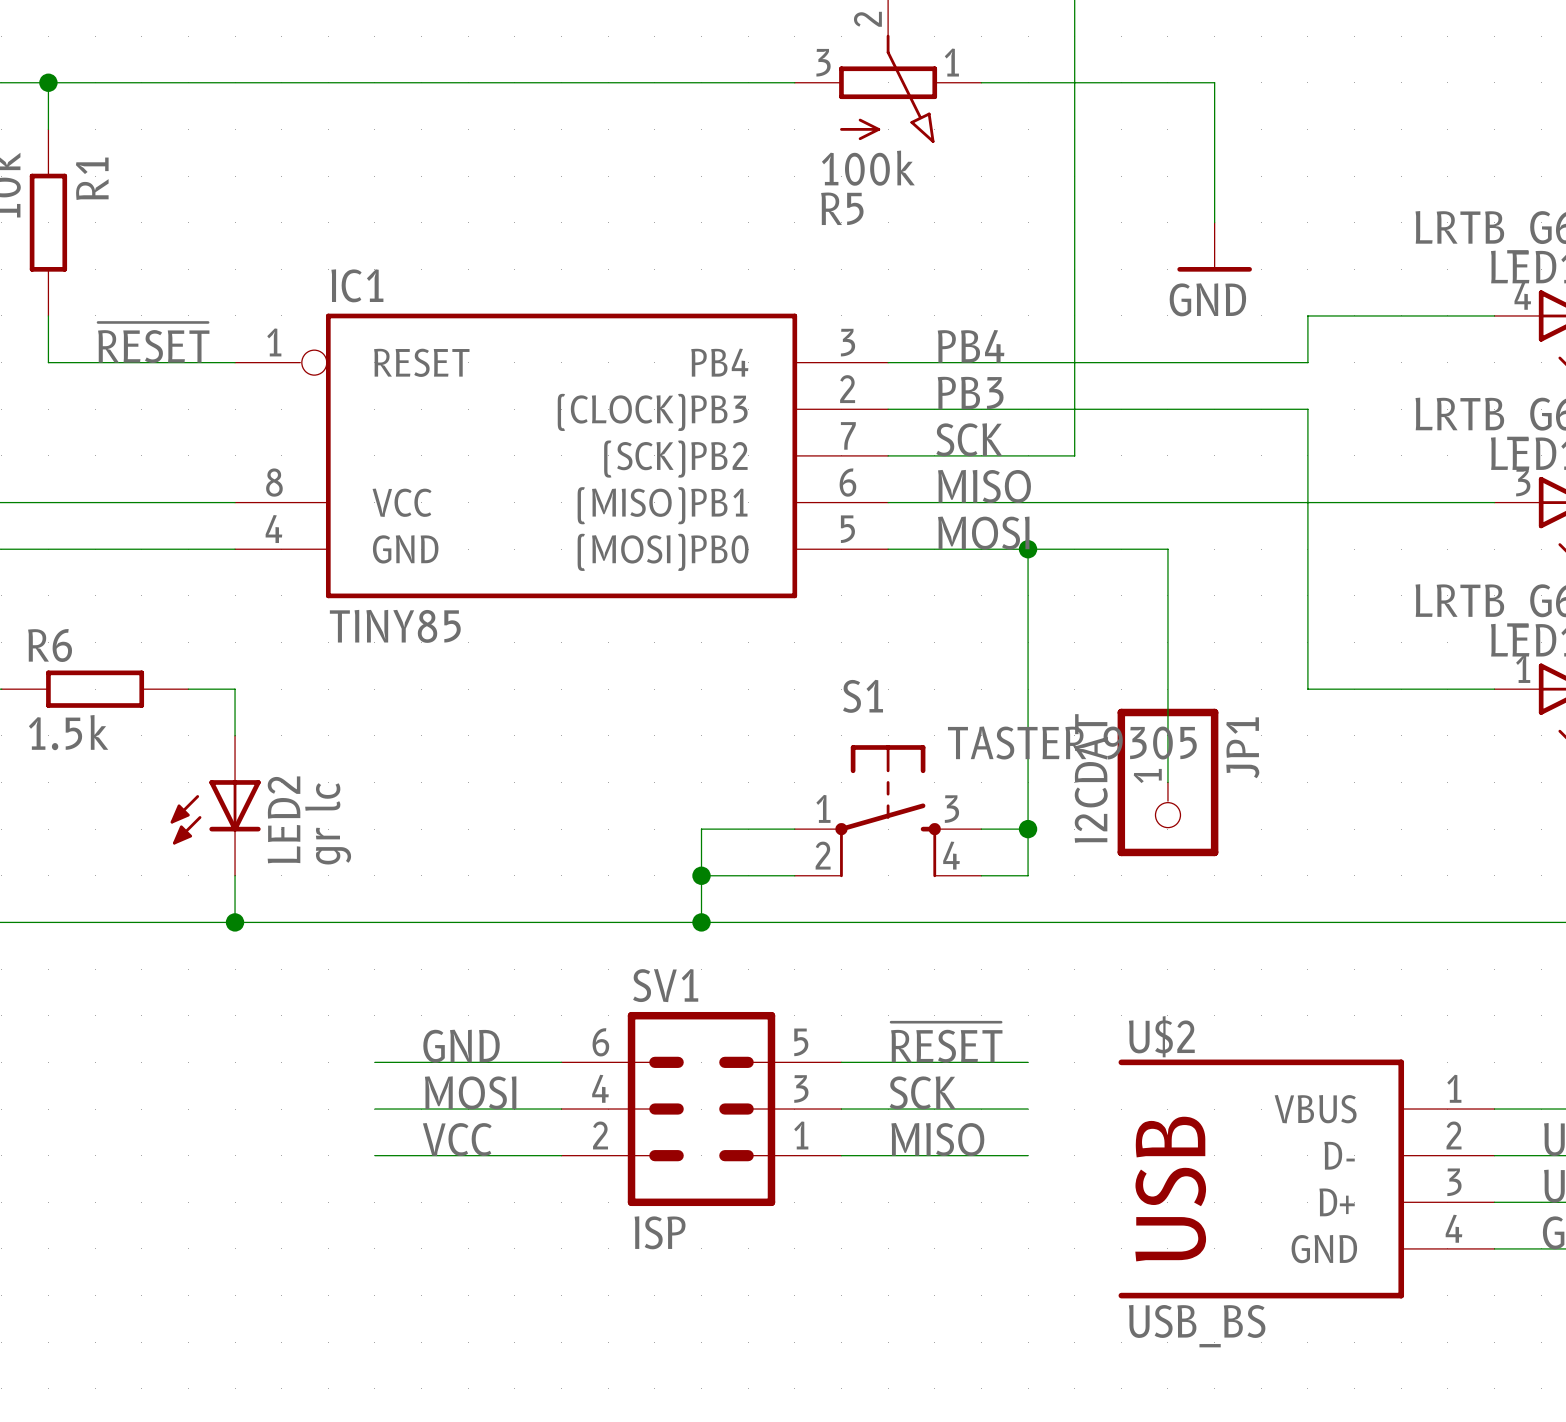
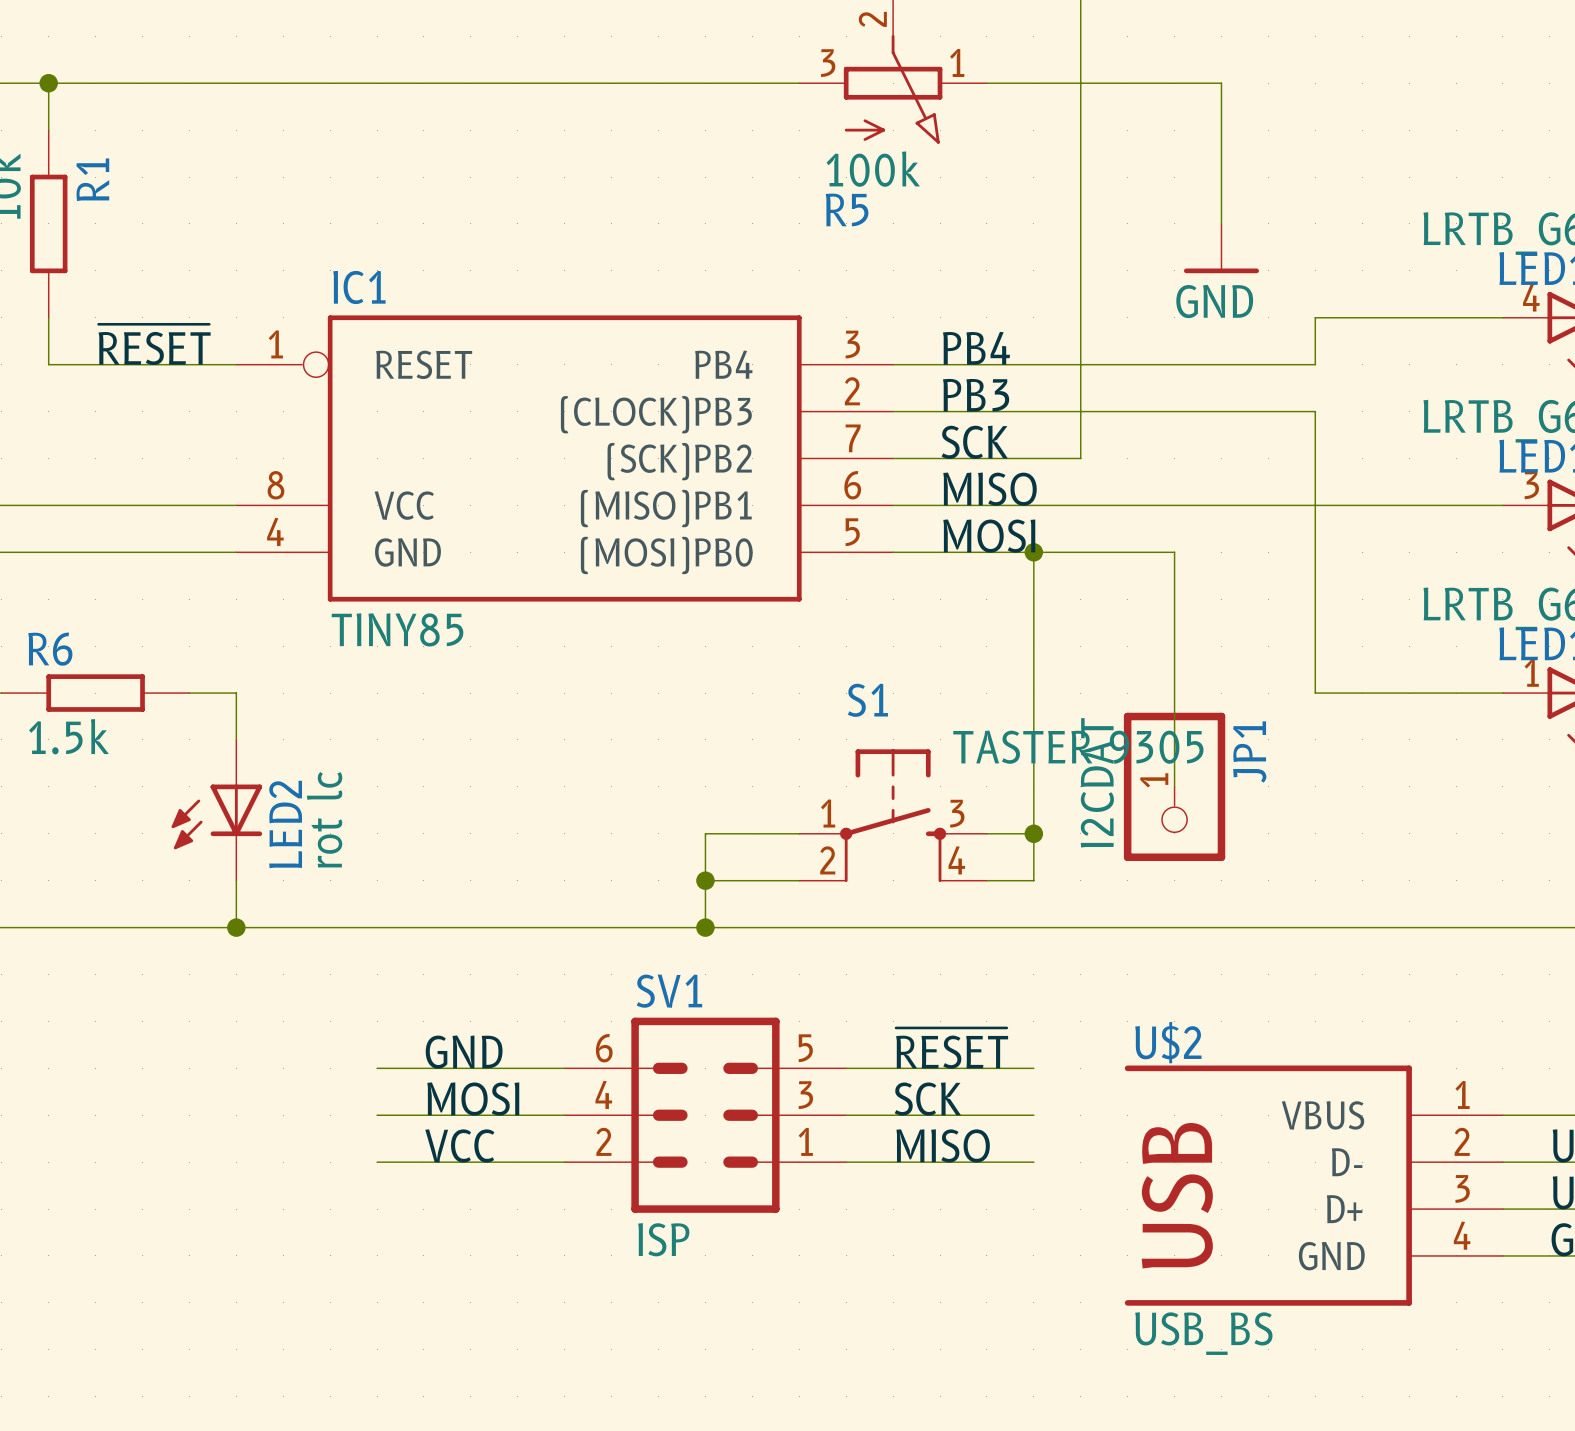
LED2 value: gr lc (328, 823) -> rot lc (324, 819)

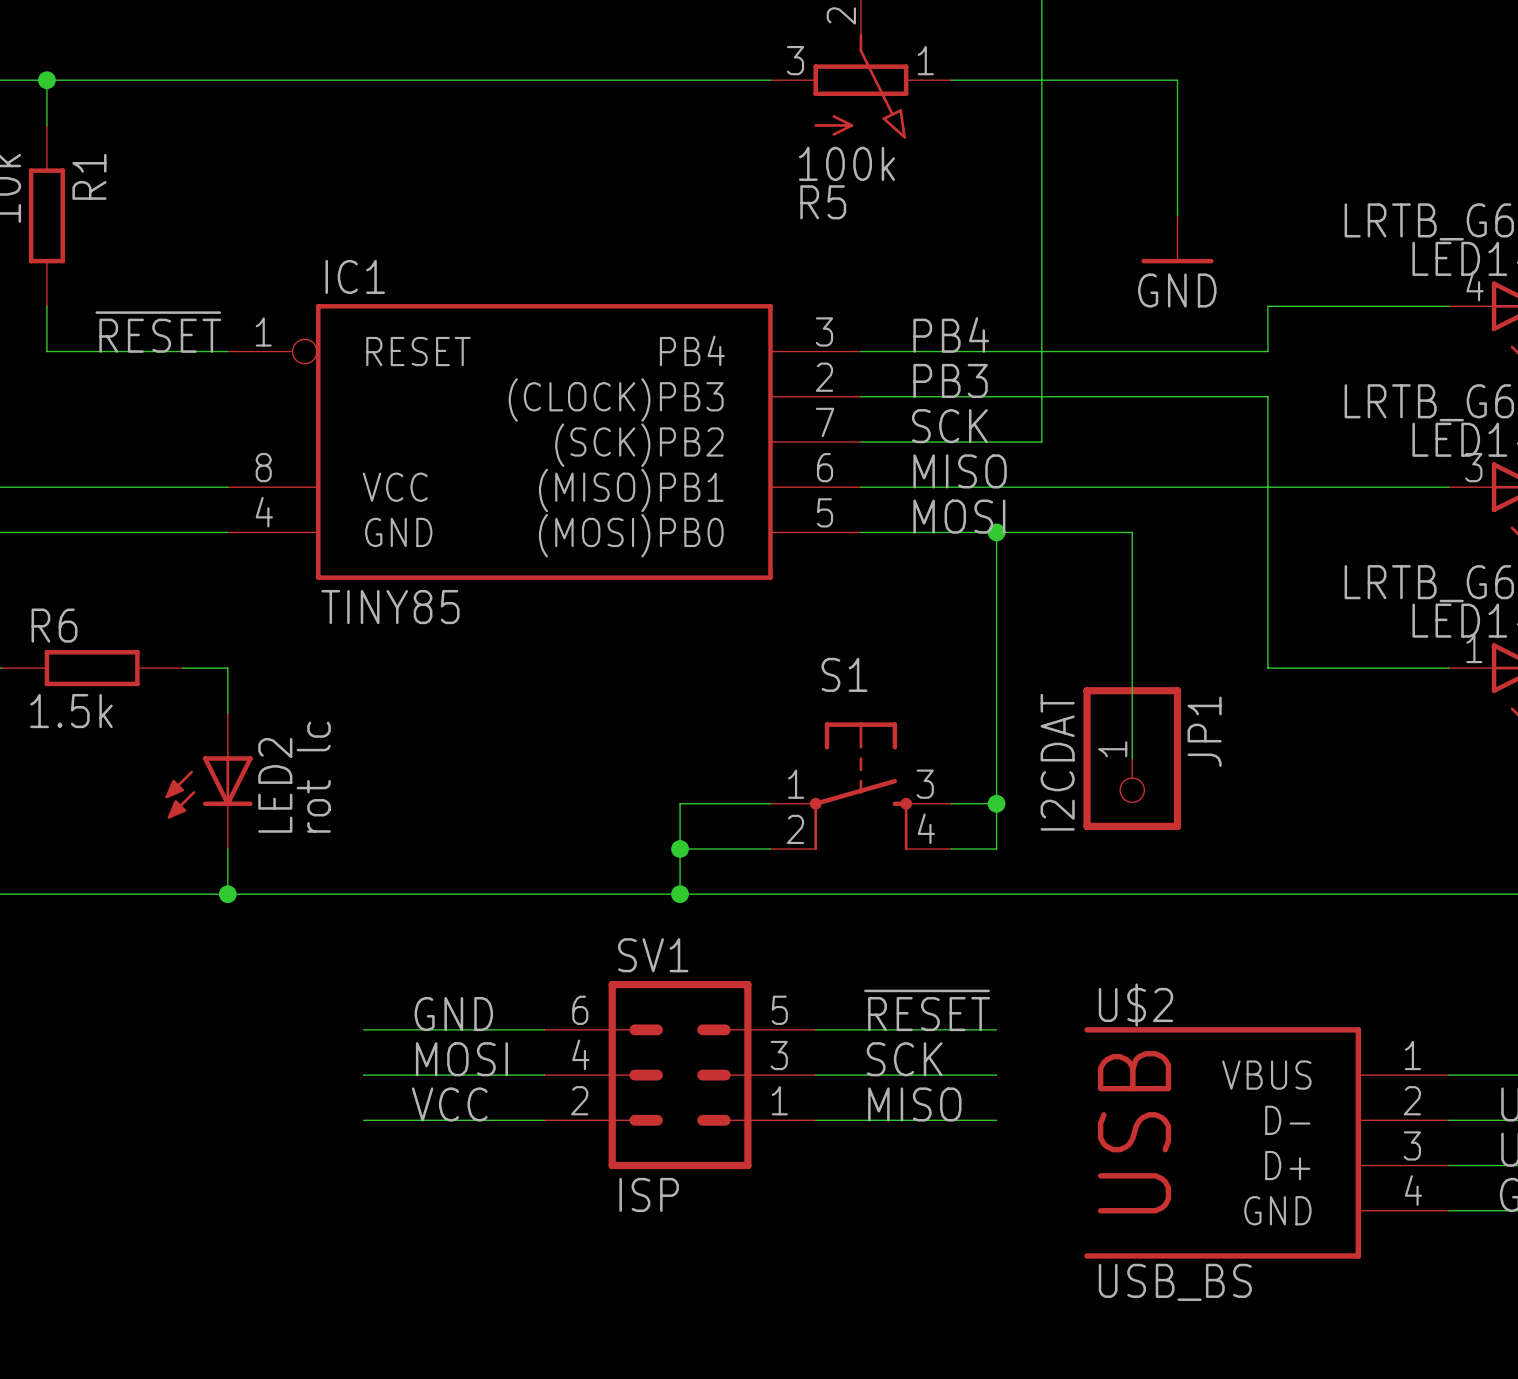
S1 value: TASTER 9305 (1078, 747) -> none

